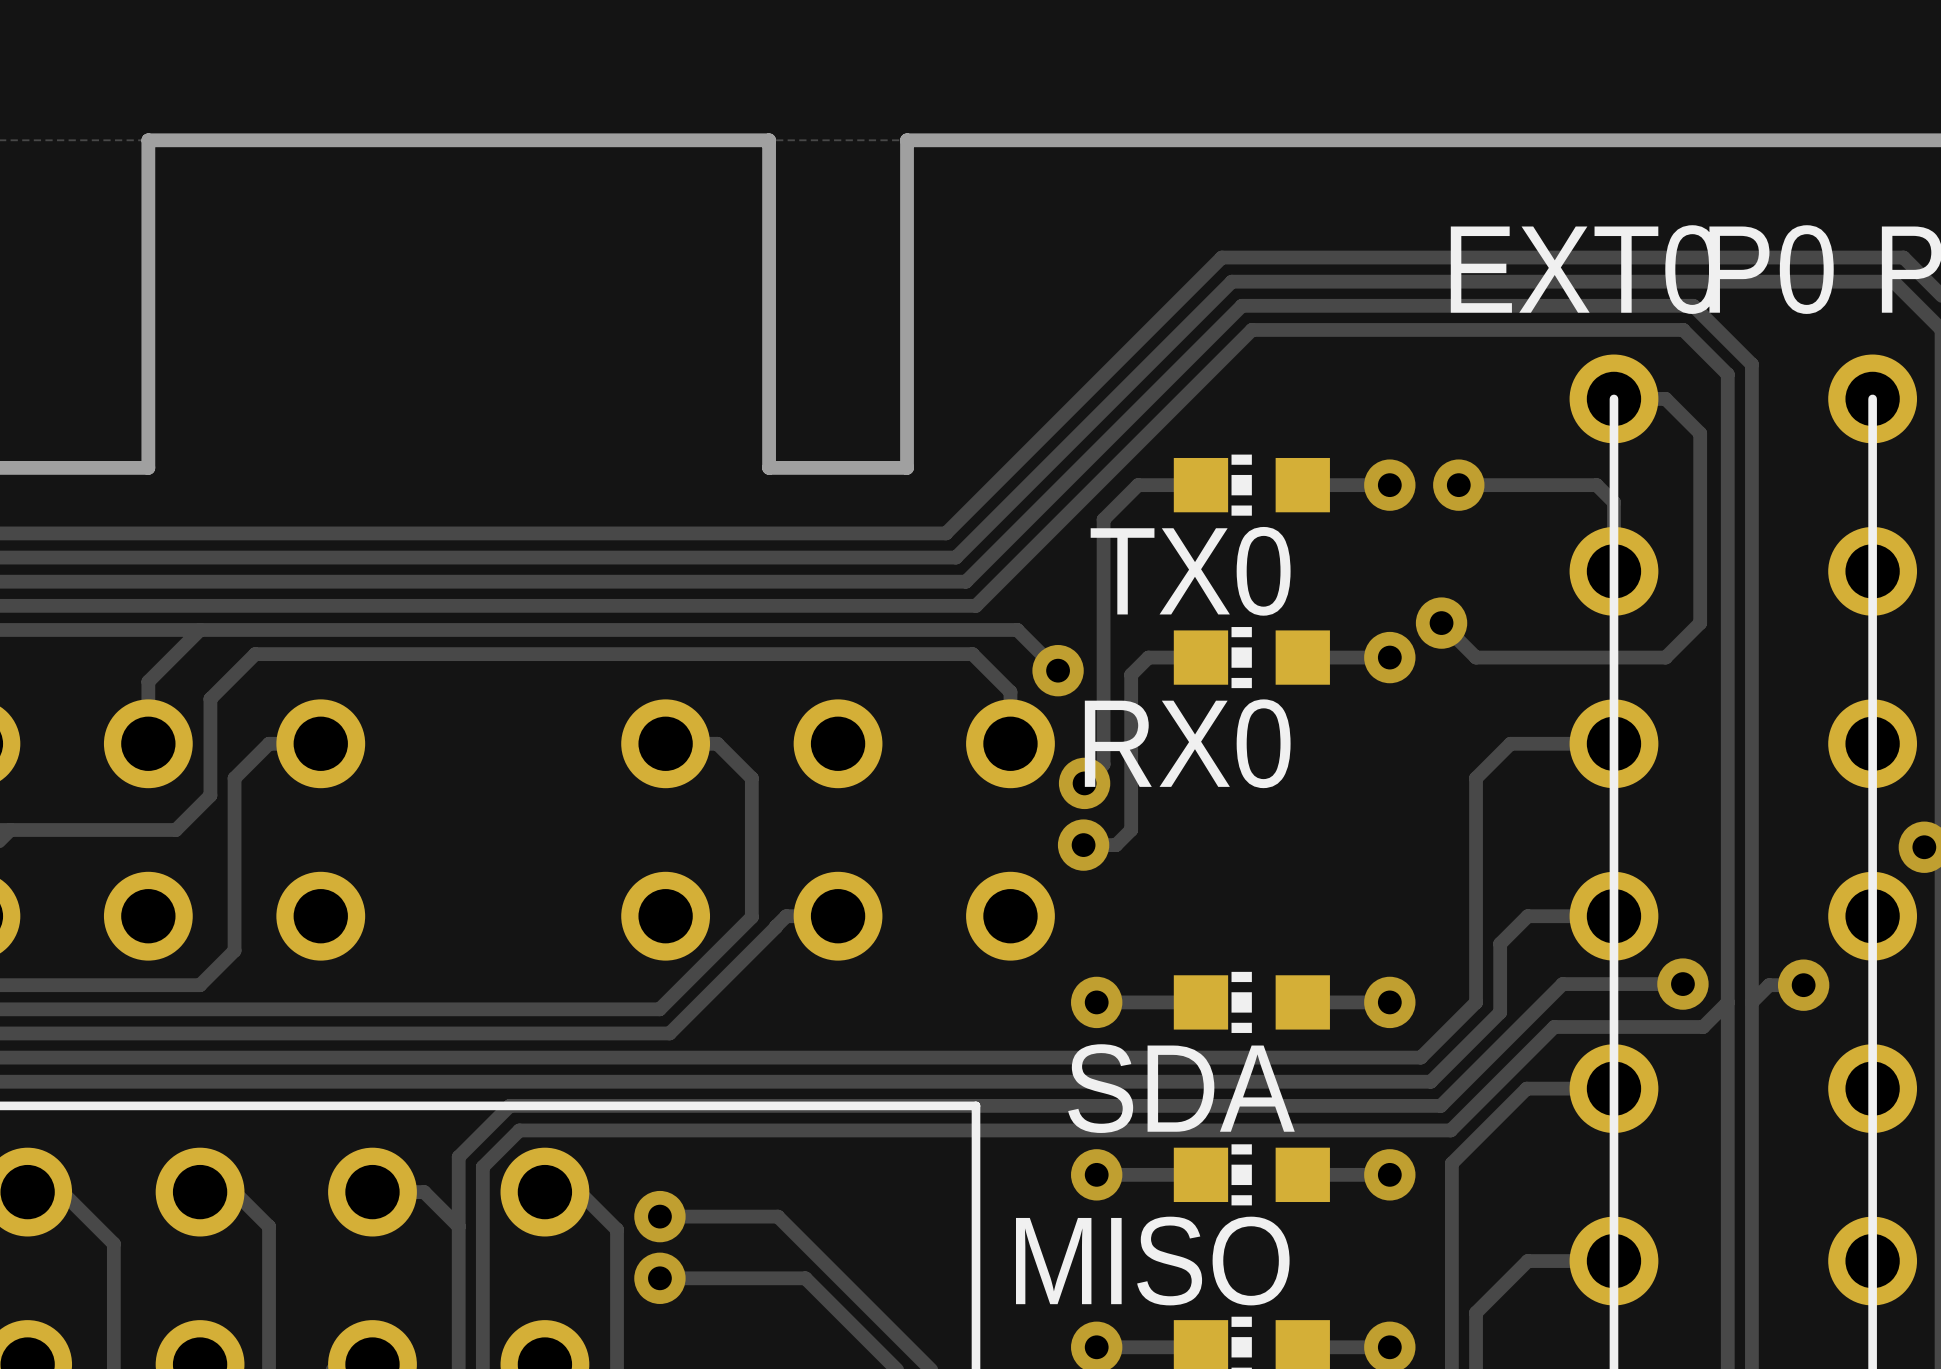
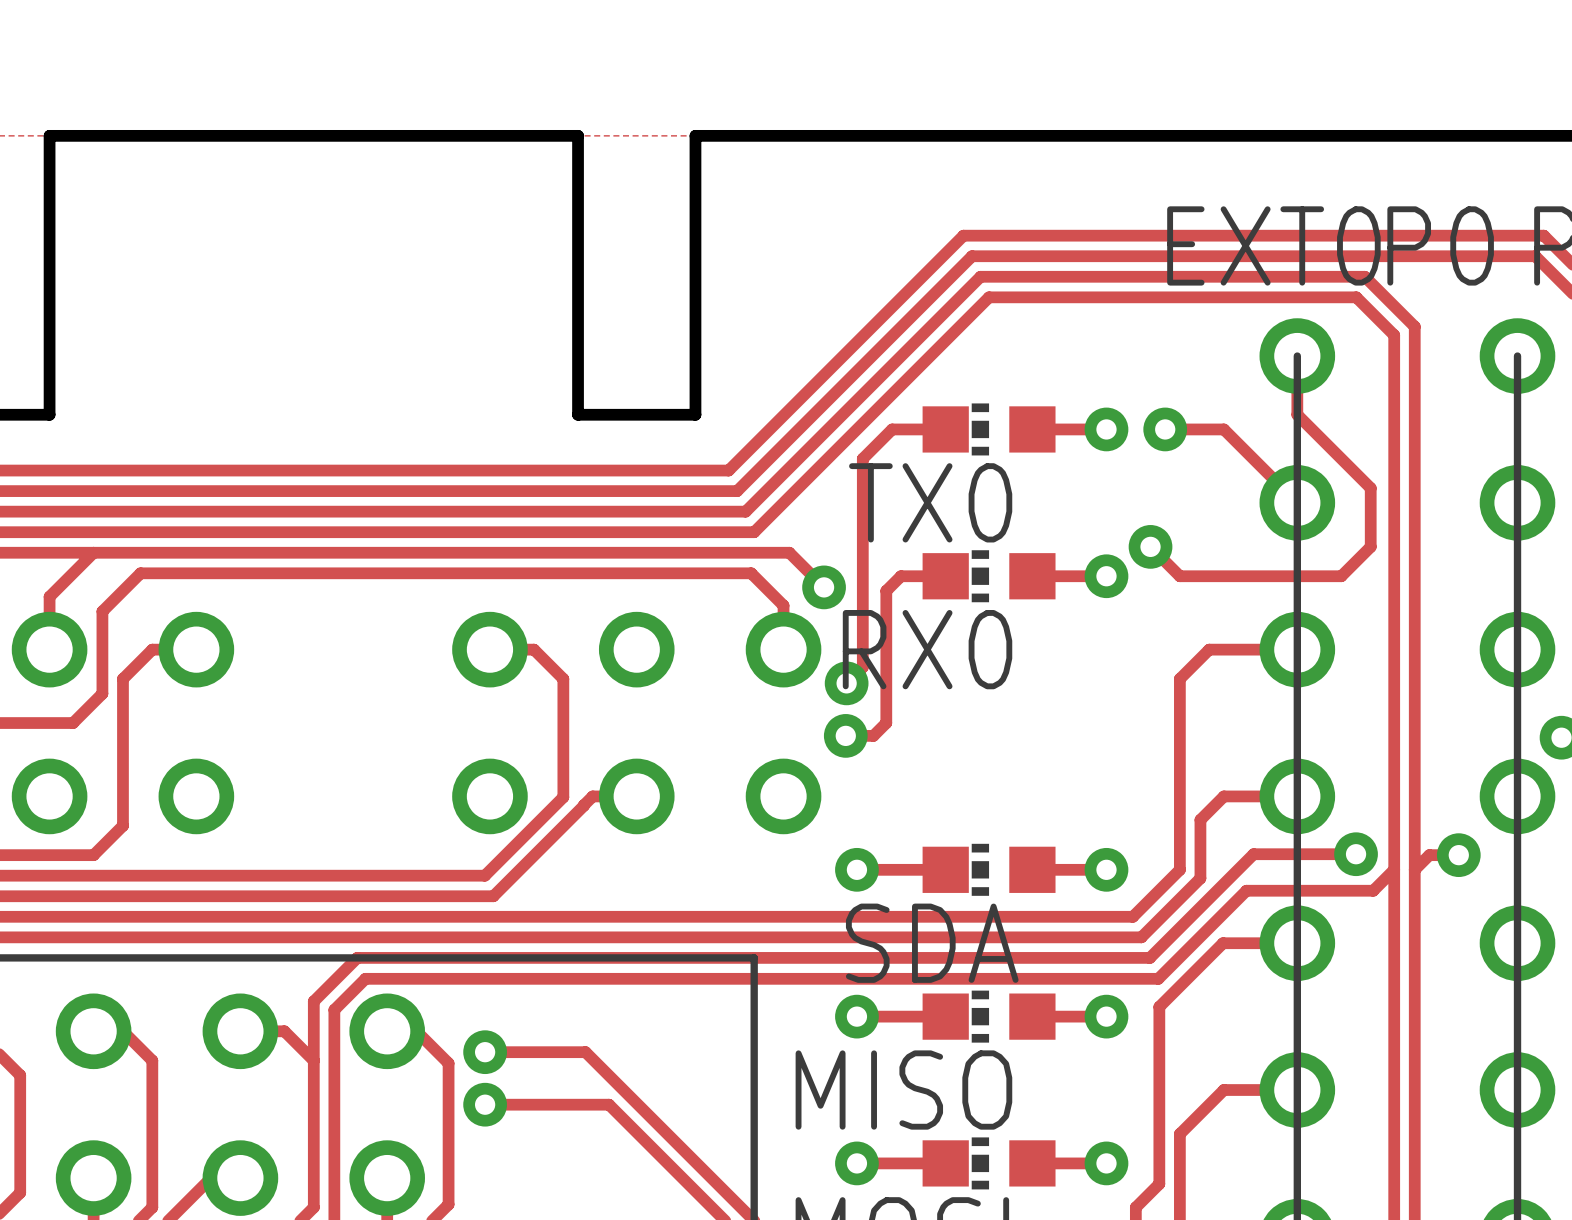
track: (1613, 398) (1665, 398) (1700, 433) (1700, 554) -> (1297, 356) (1297, 414) (1370, 488)
track: (1527, 485) (1596, 485) (1613, 502) (1613, 571) -> (1223, 429) (1297, 502)

